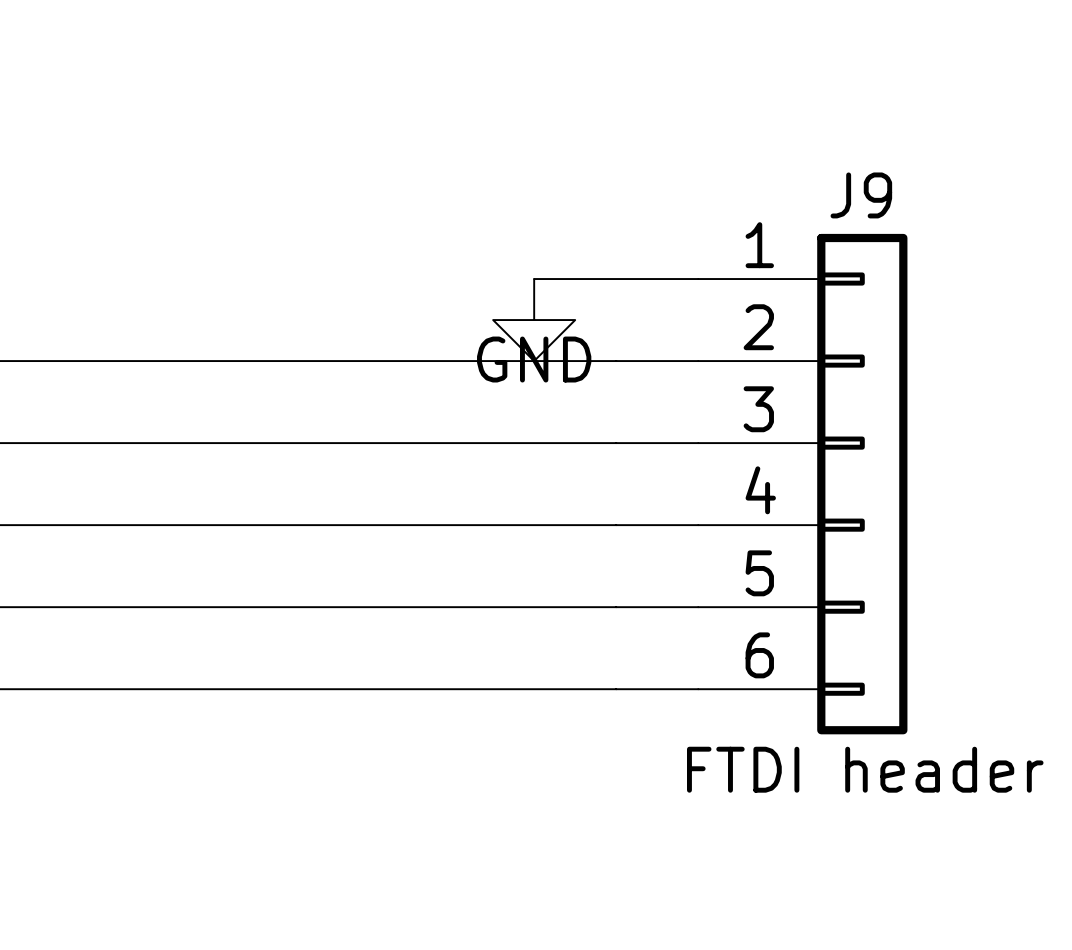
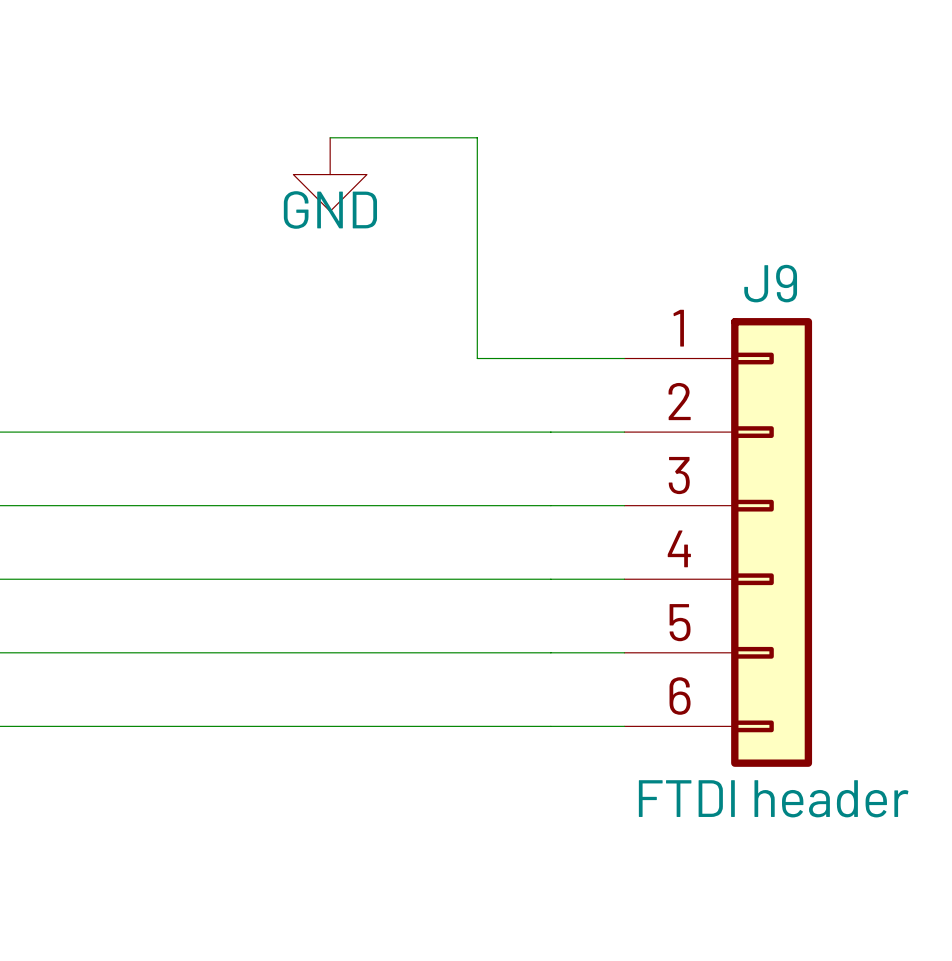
wire: none -> (330, 137) (477, 137) (477, 358)
power symbol position: GND (534, 320) -> GND (330, 174)

